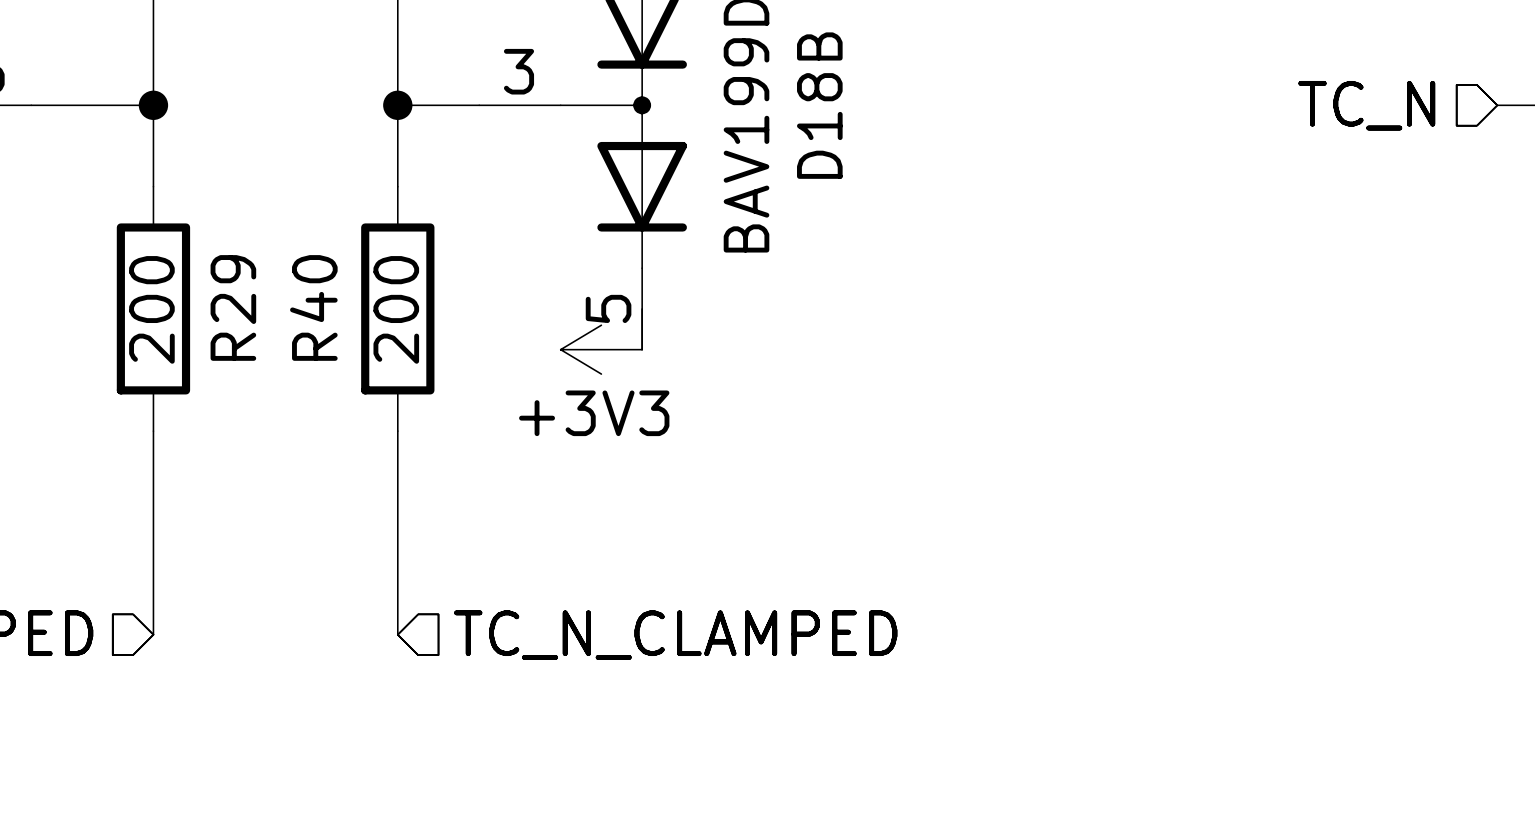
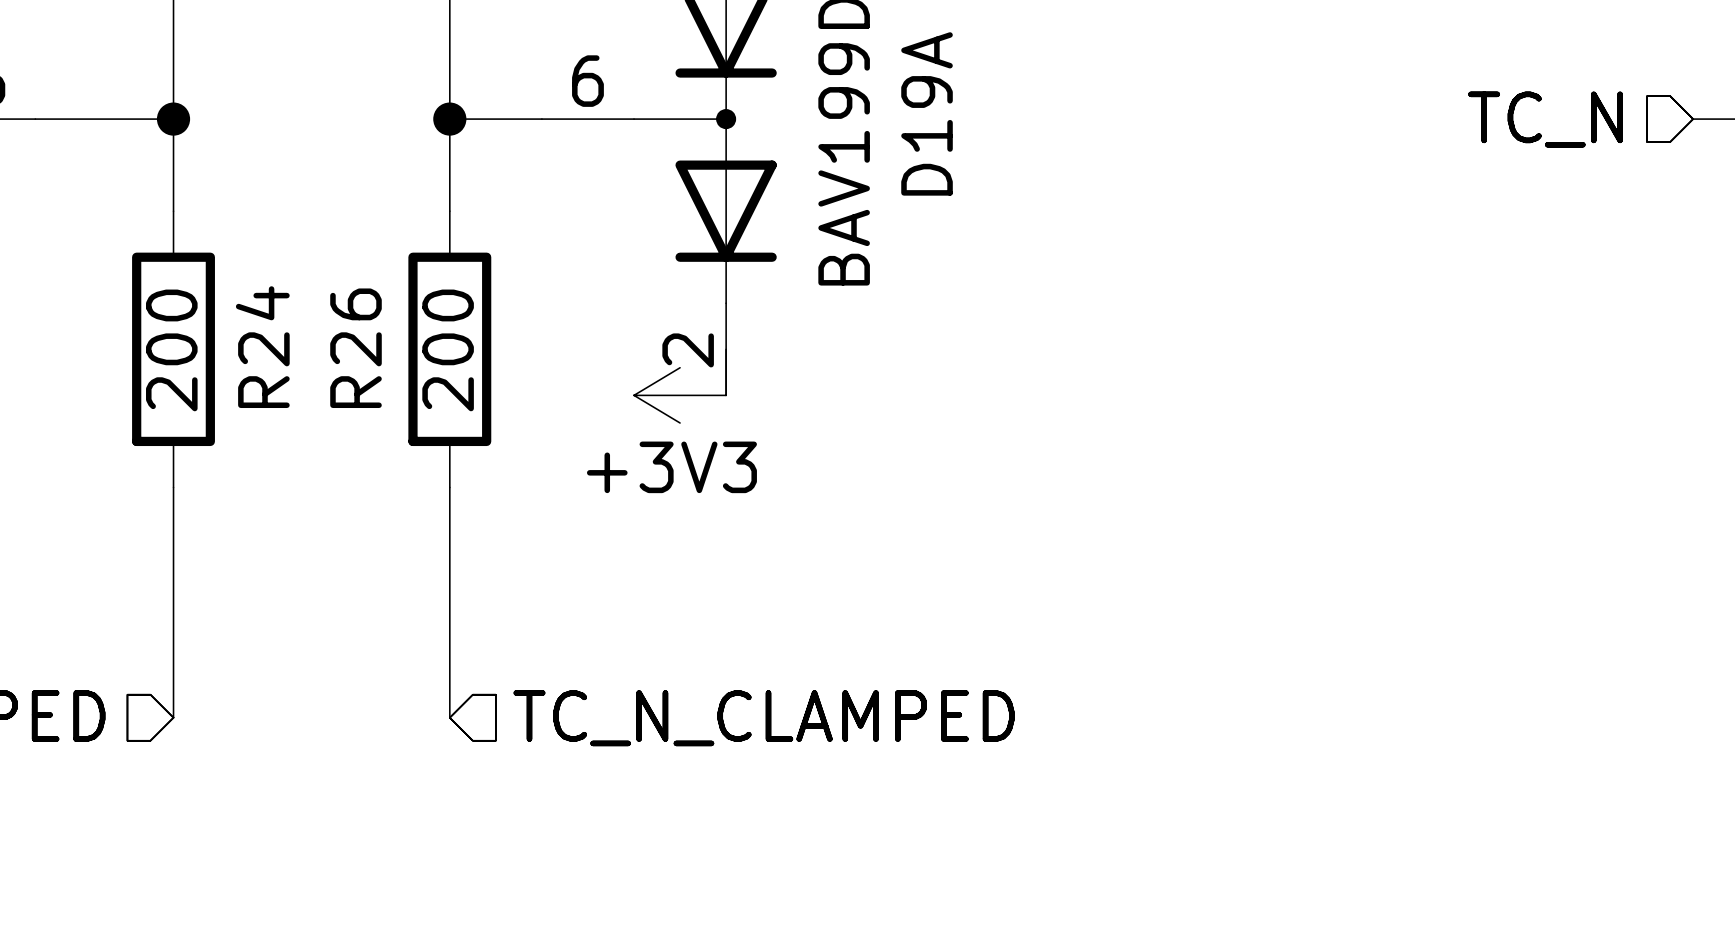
D18B pin number: 3 (519, 71) -> 6 (587, 81)
D18B name: D18B (819, 105) -> D19A (927, 113)
R29 name: R29 (233, 307) -> R24 (262, 347)
R40 name: R40 (313, 307) -> R26 (356, 348)
D18B pin number: 5 (608, 308) -> 2 (688, 350)

